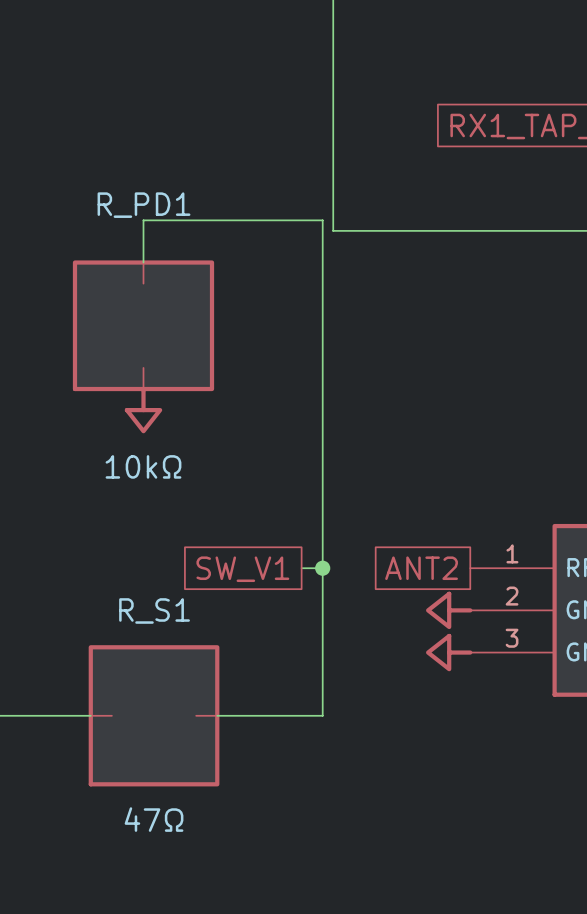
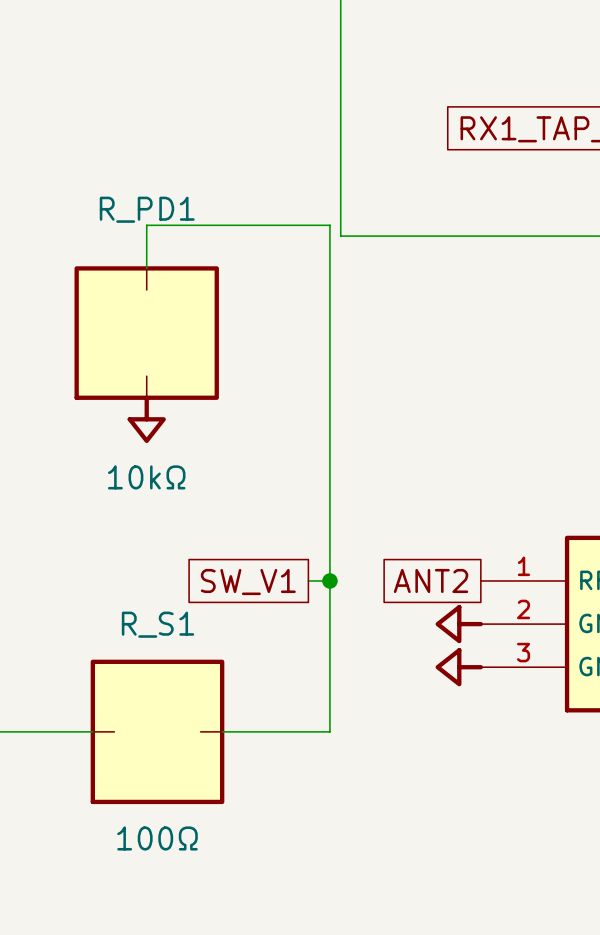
R_S1 value: 47Ω (154, 819) -> 100Ω (157, 838)

